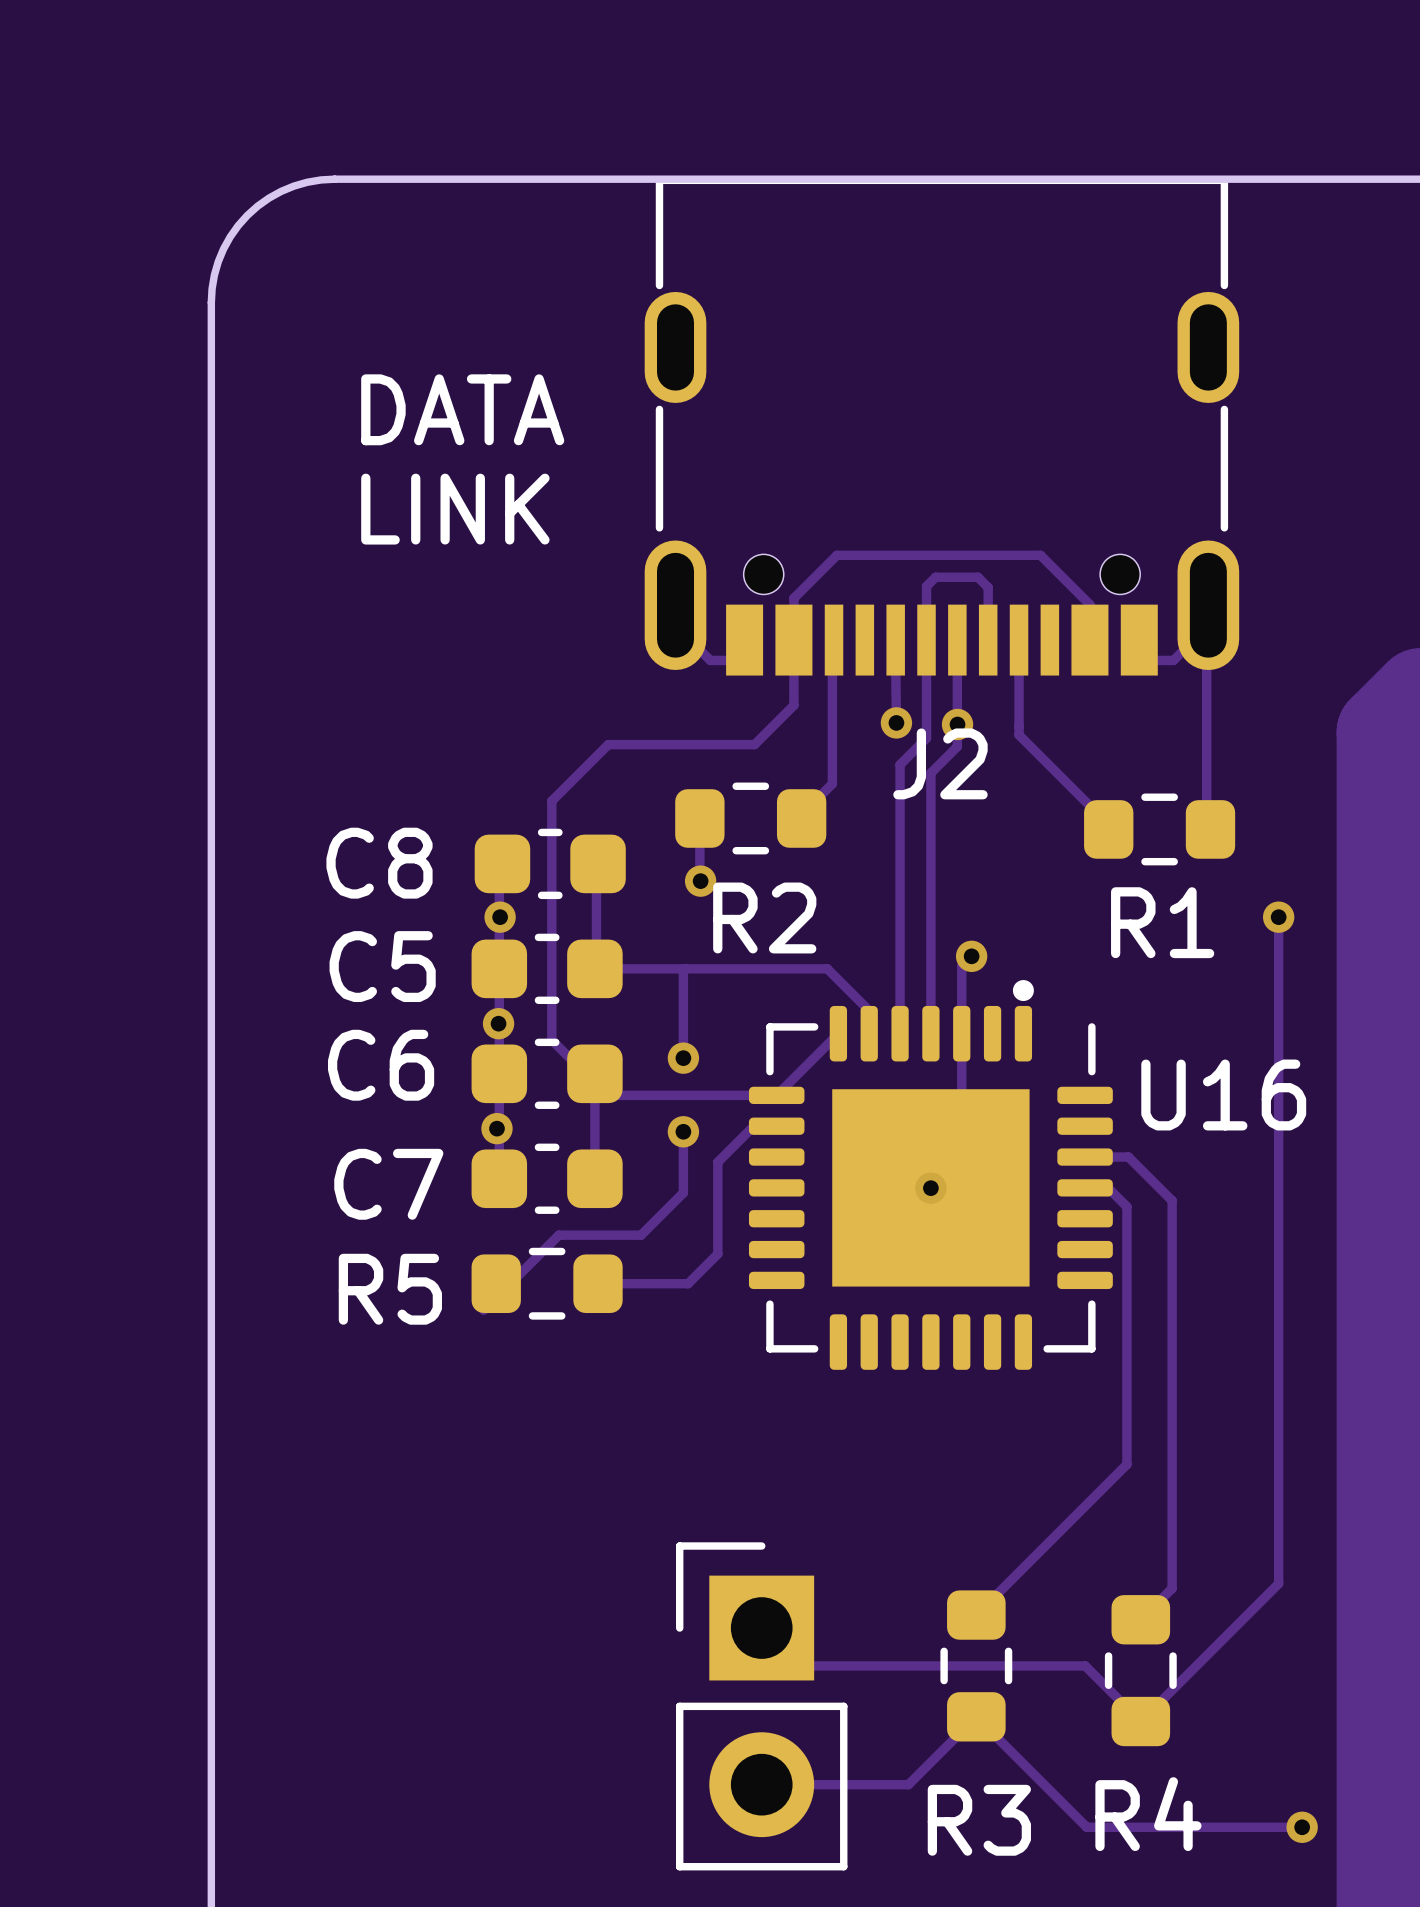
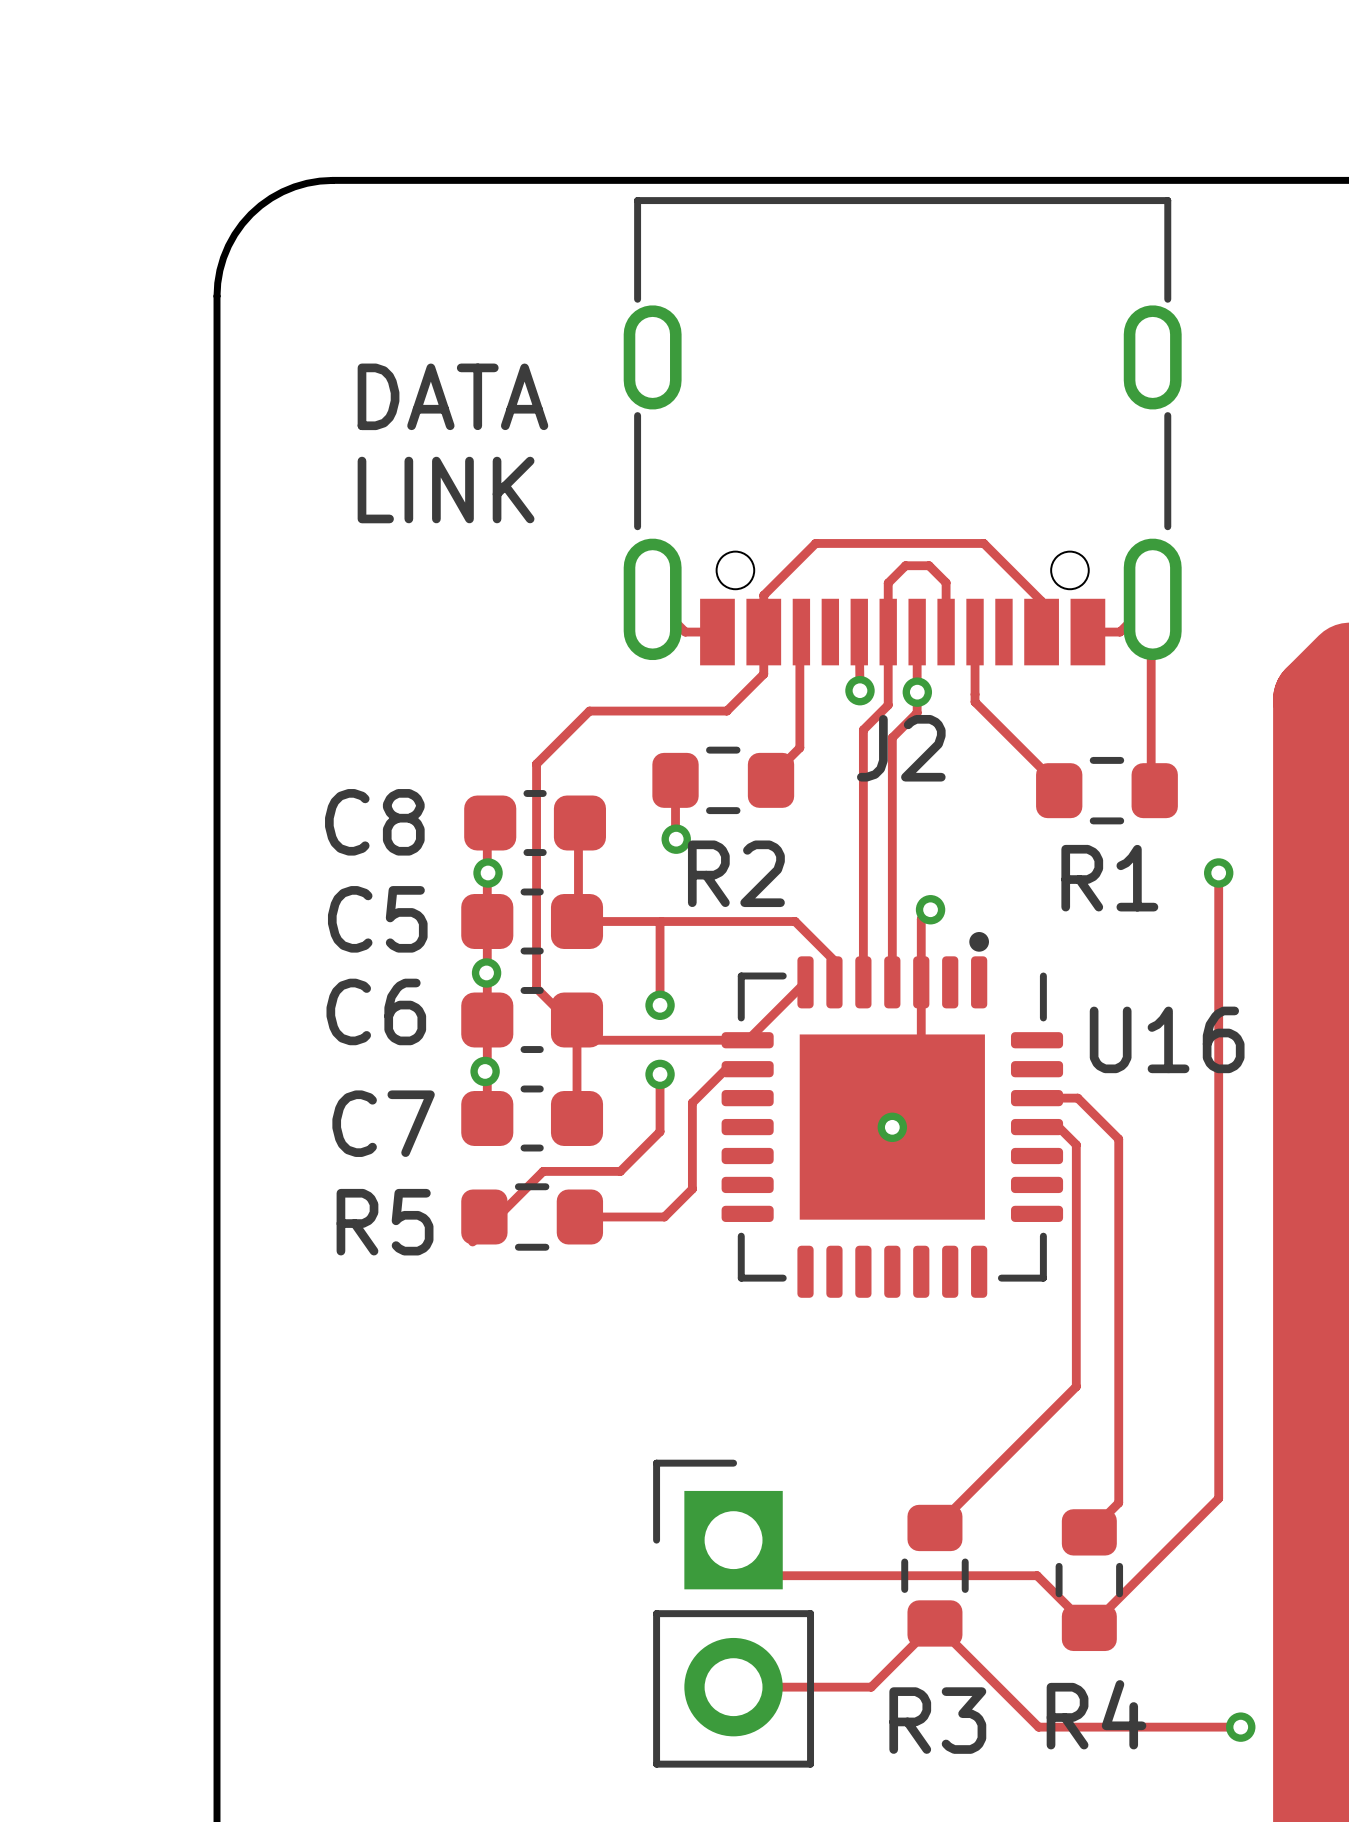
J2 position: (941, 426) -> (902, 431)
track: (988, 607) (988, 587) (977, 577) (935, 577) (926, 586) (926, 608) -> (946, 582) (929, 565) (905, 565) (888, 583)
track: (793, 621) (793, 598) (836, 555) (1040, 555) (1089, 604) (1089, 627) -> (763, 595) (815, 543) (983, 543) (1041, 601)

